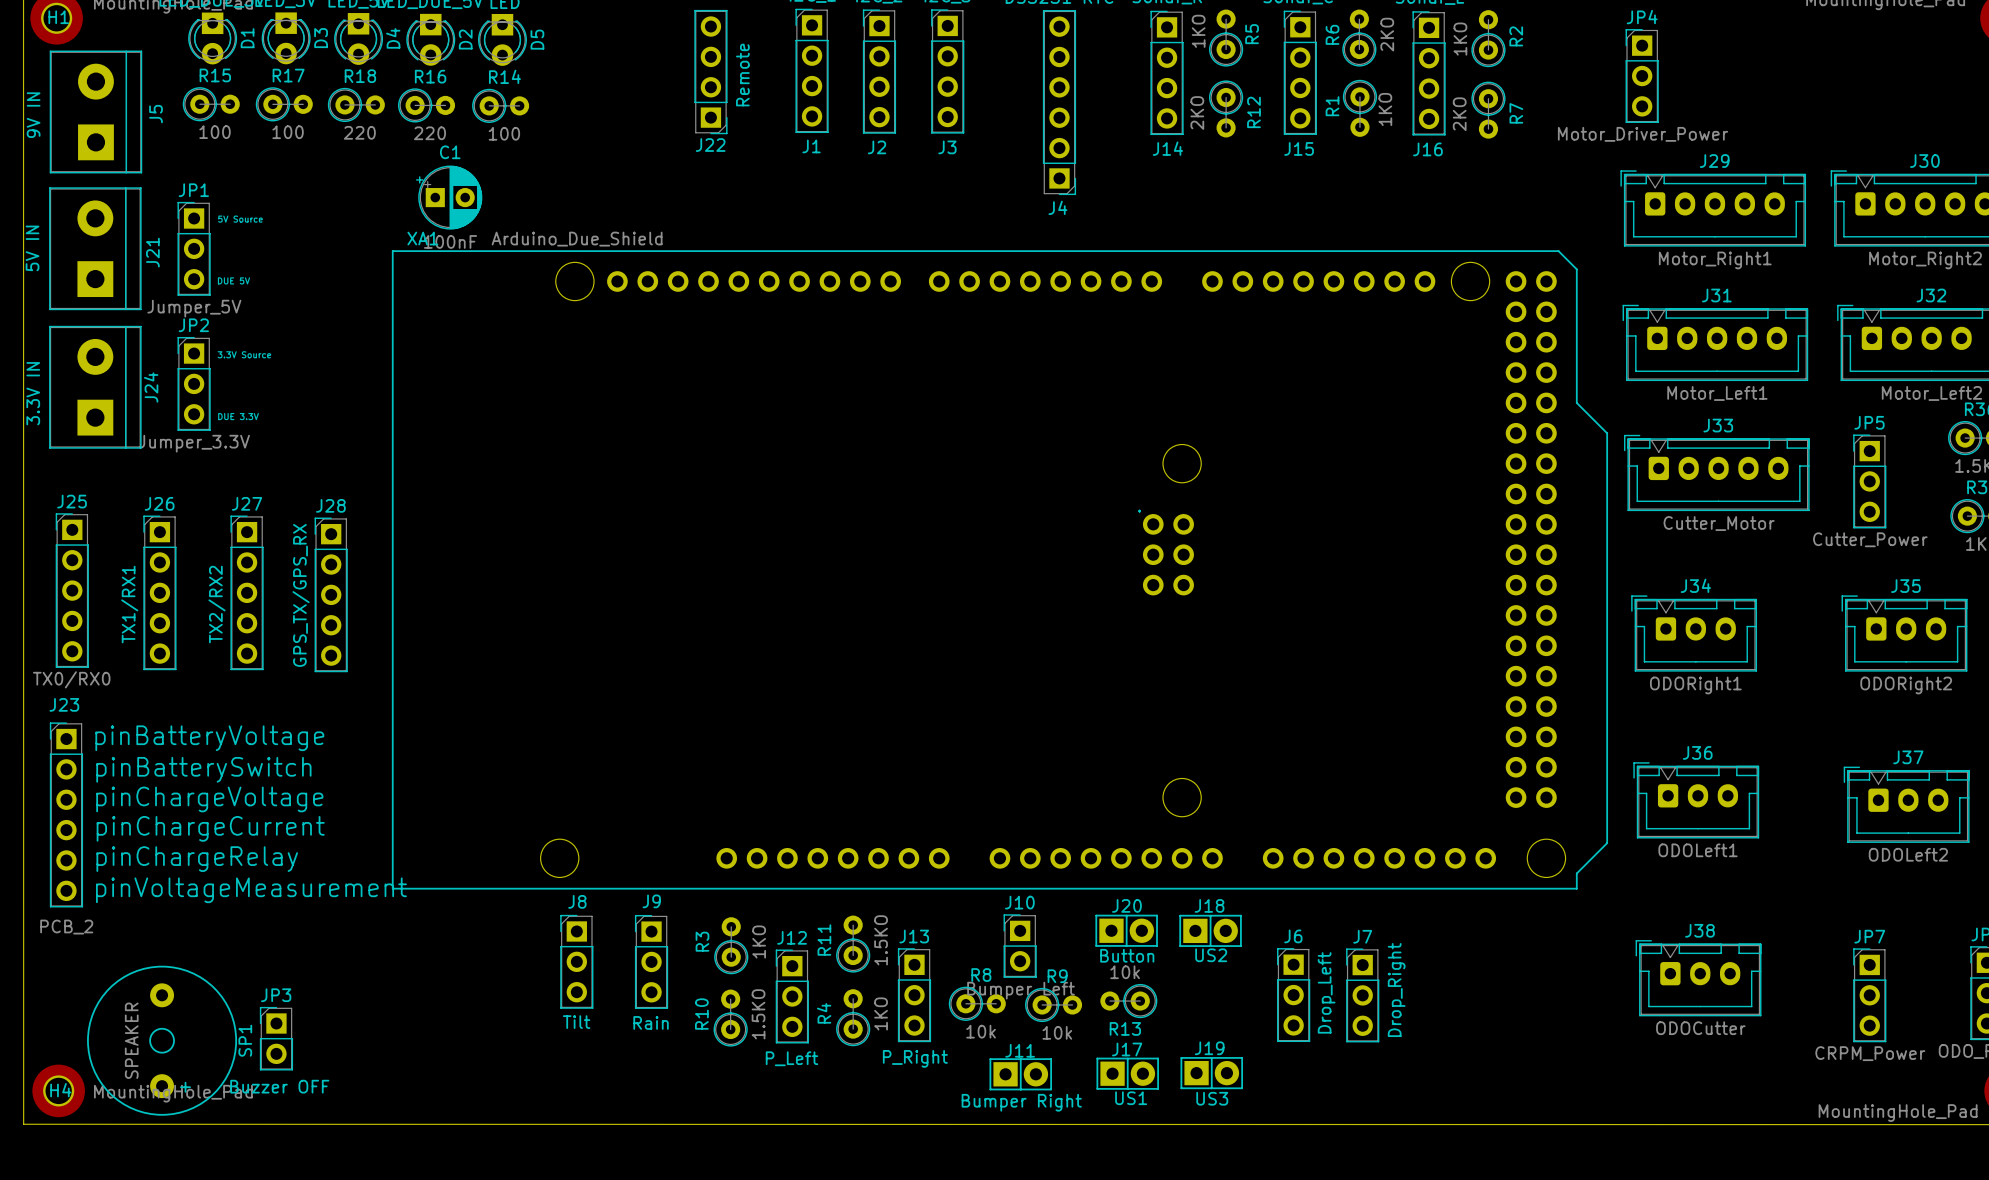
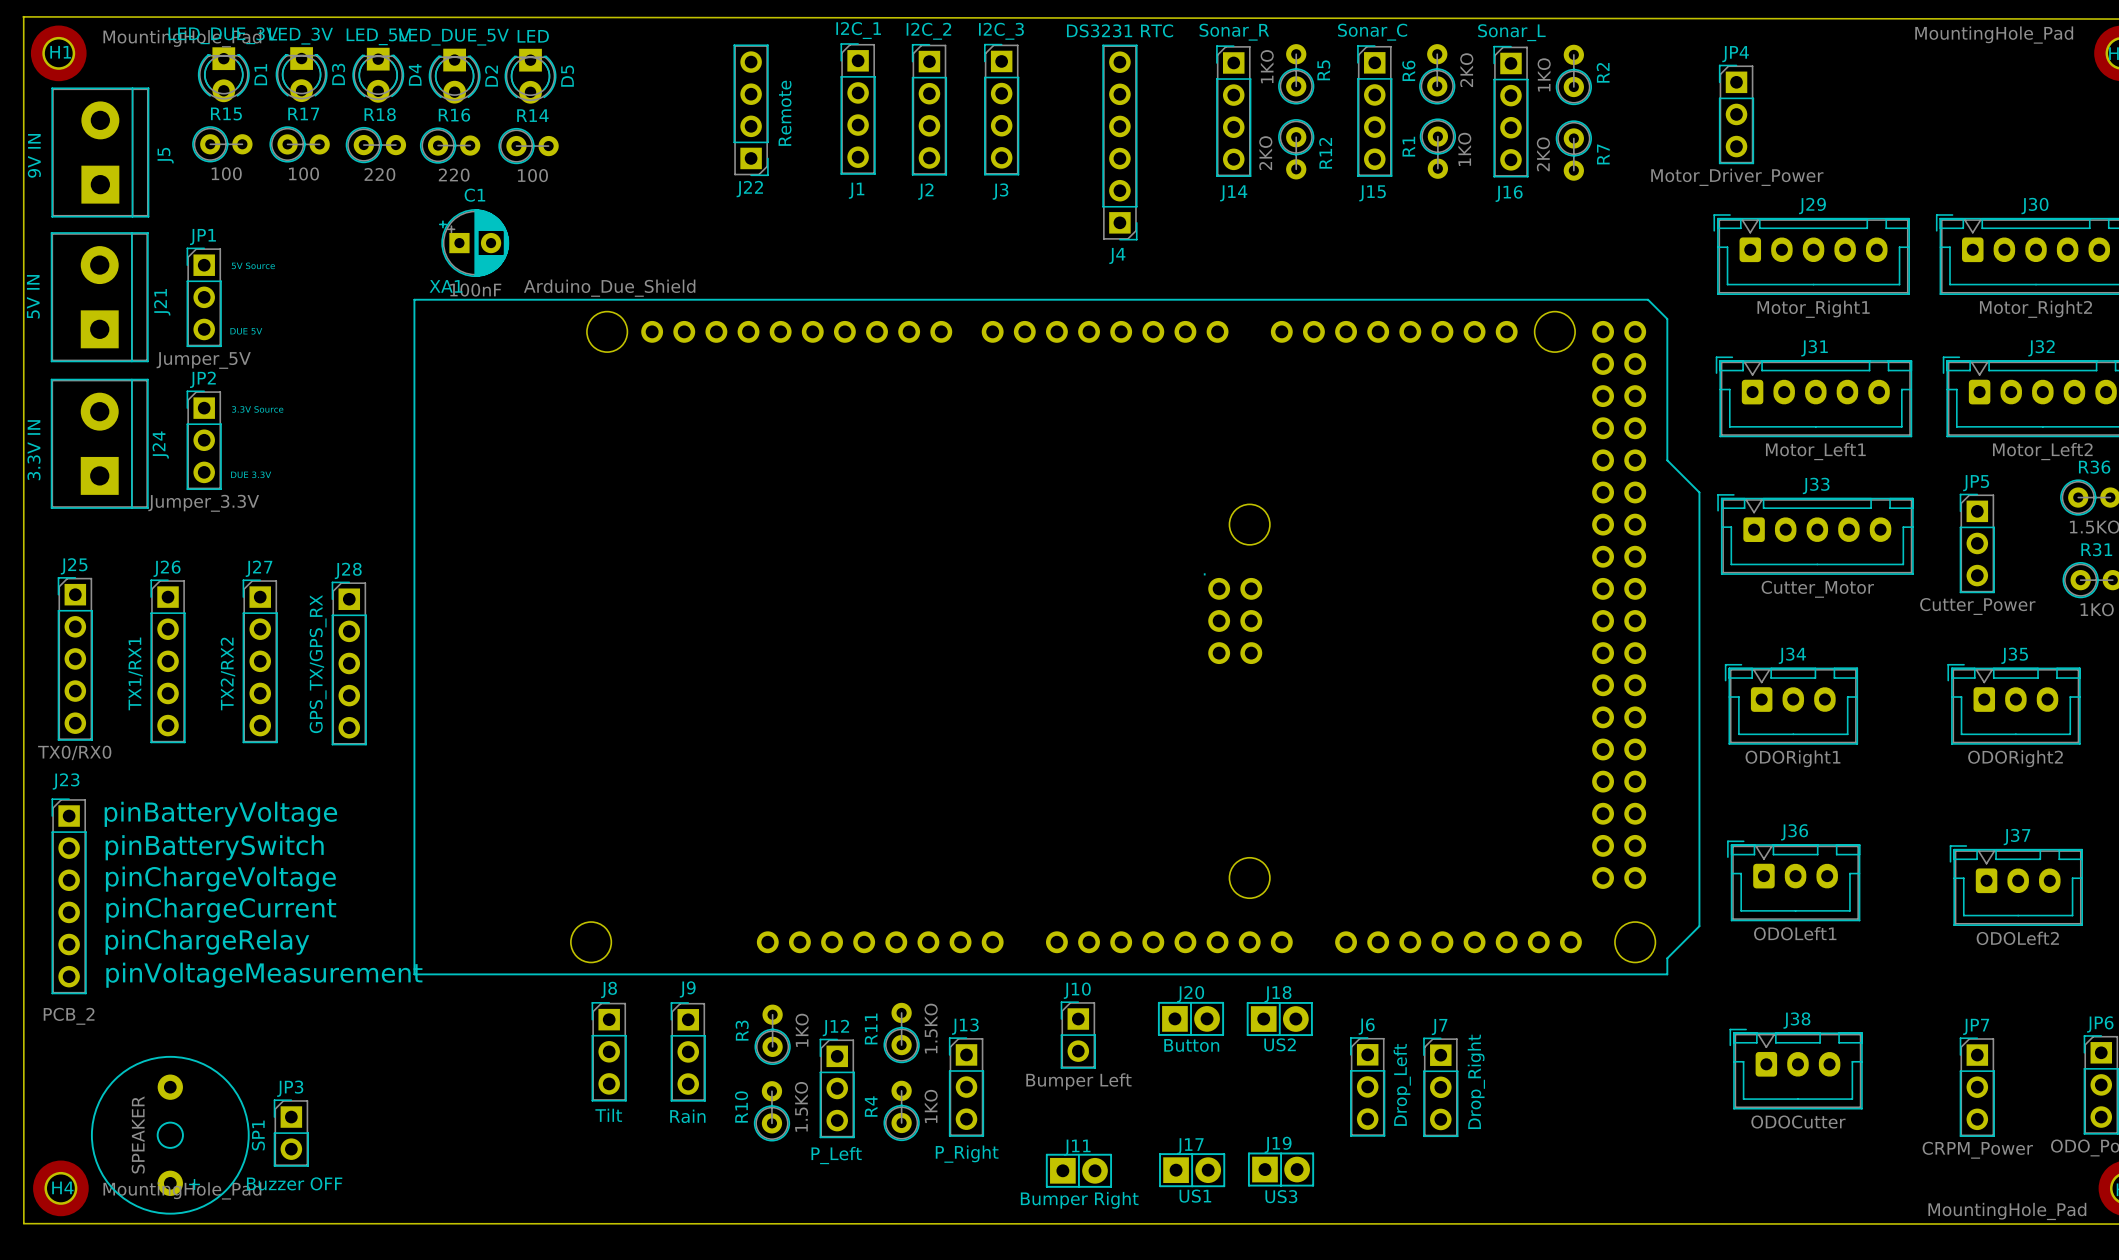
R13: 10k (1128, 1001) -> none
R8: 10k (977, 1003) -> none
R9: 10k (1053, 1004) -> none

